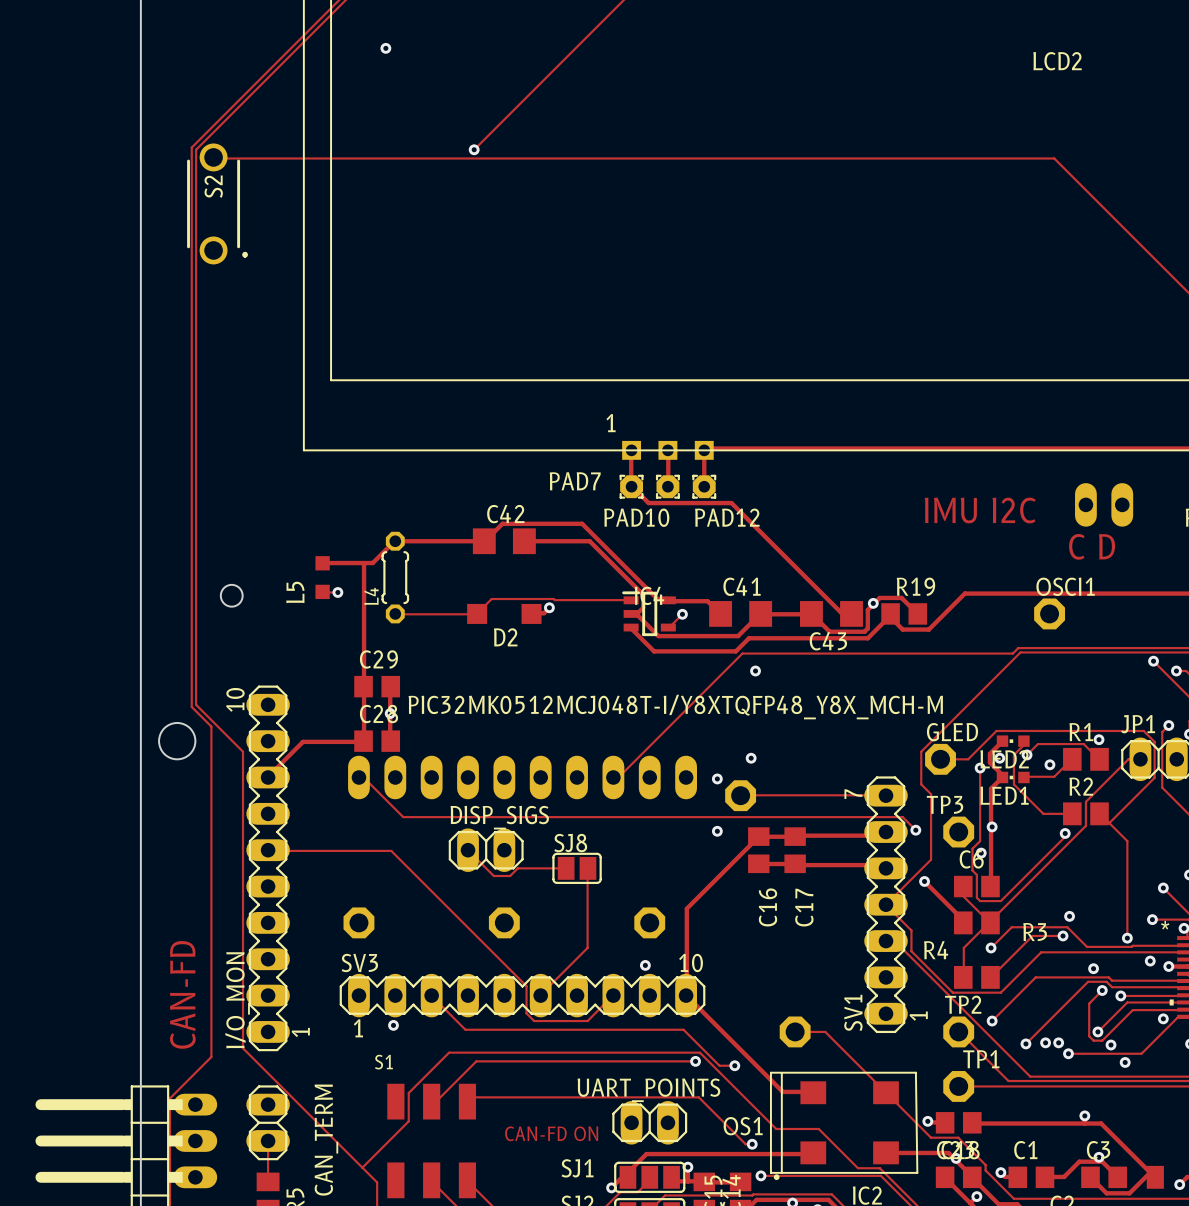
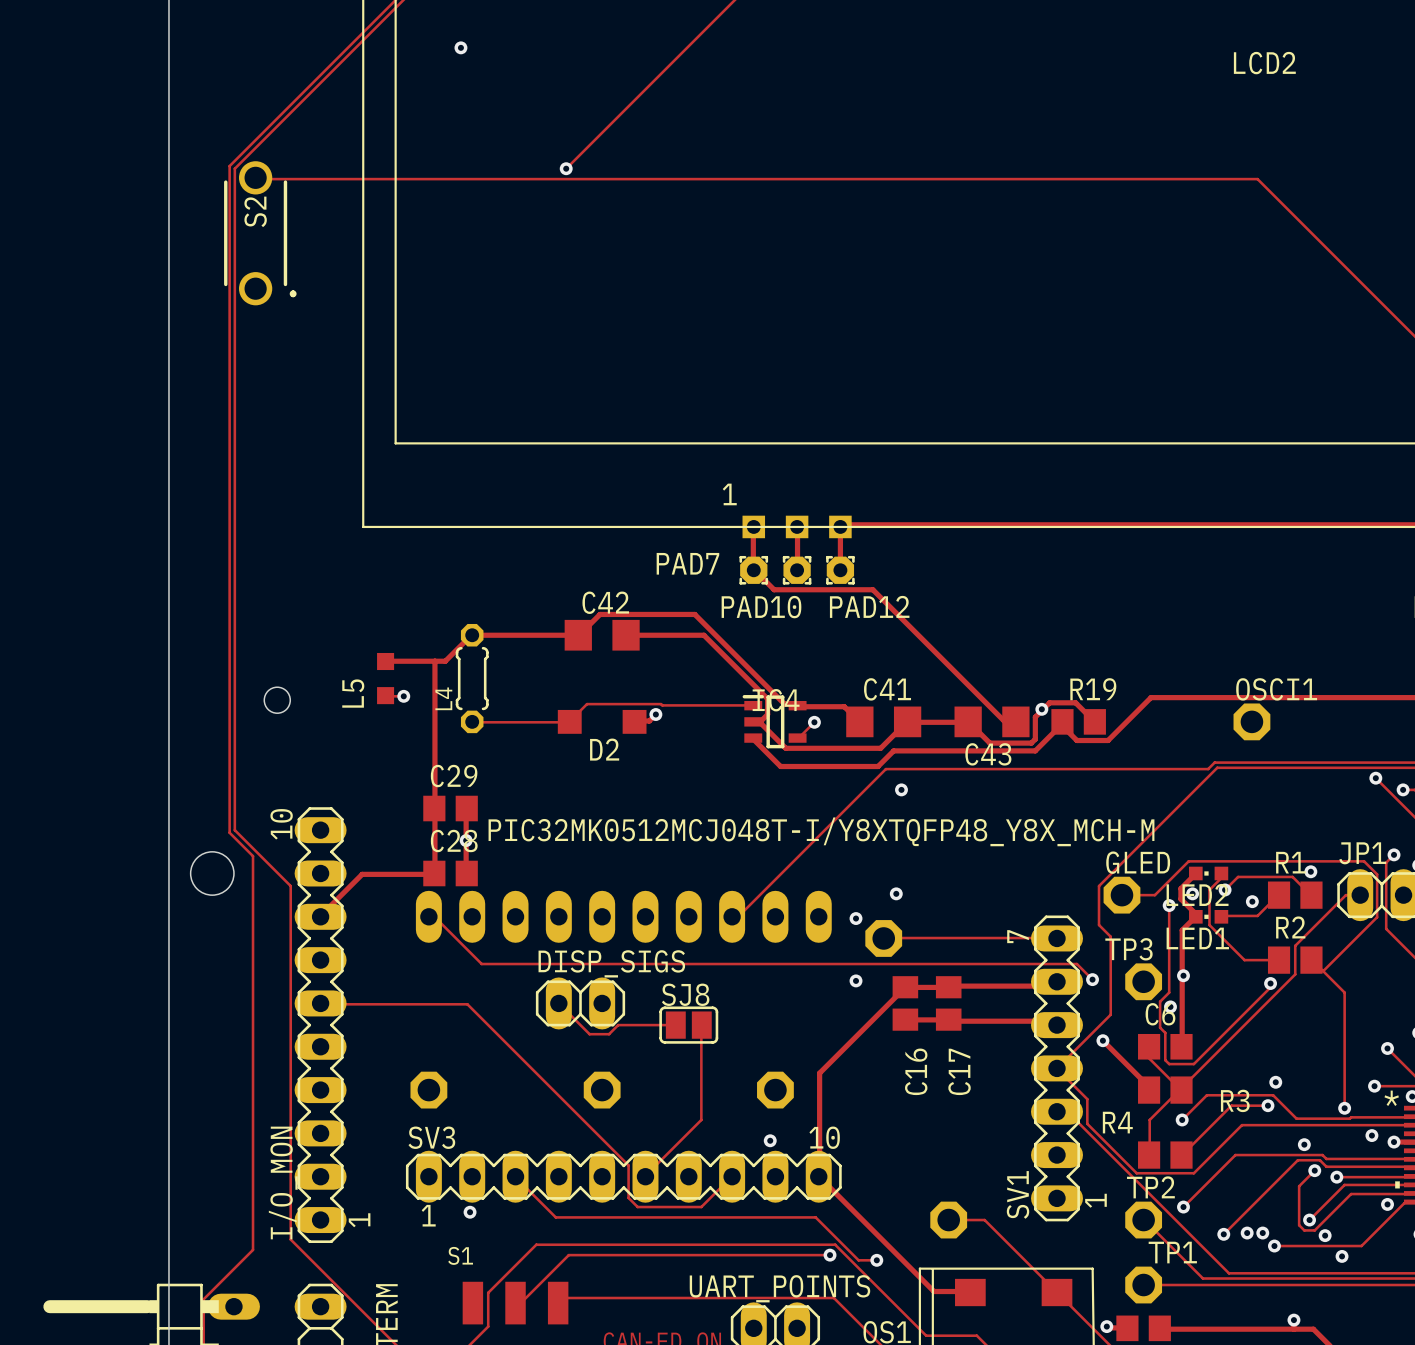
part: (1104, 504) -> none
text: IMU I2C (980, 510) -> none
text: C D (1092, 546) -> none
text: CAN-FD (182, 994) -> none

